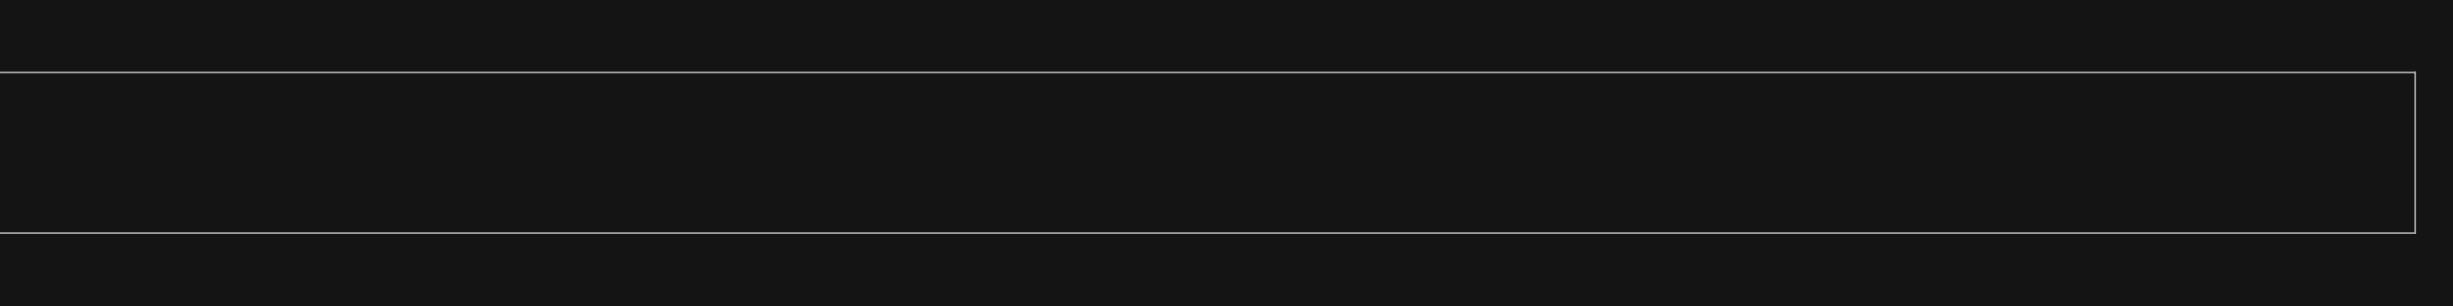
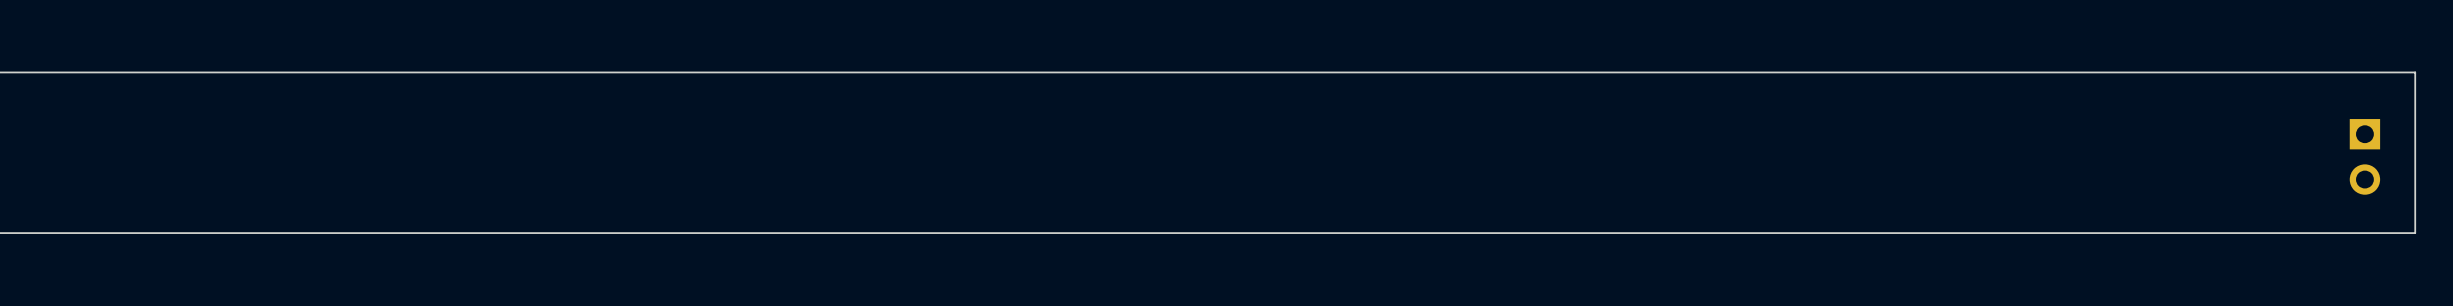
part: none -> (2364, 156)

